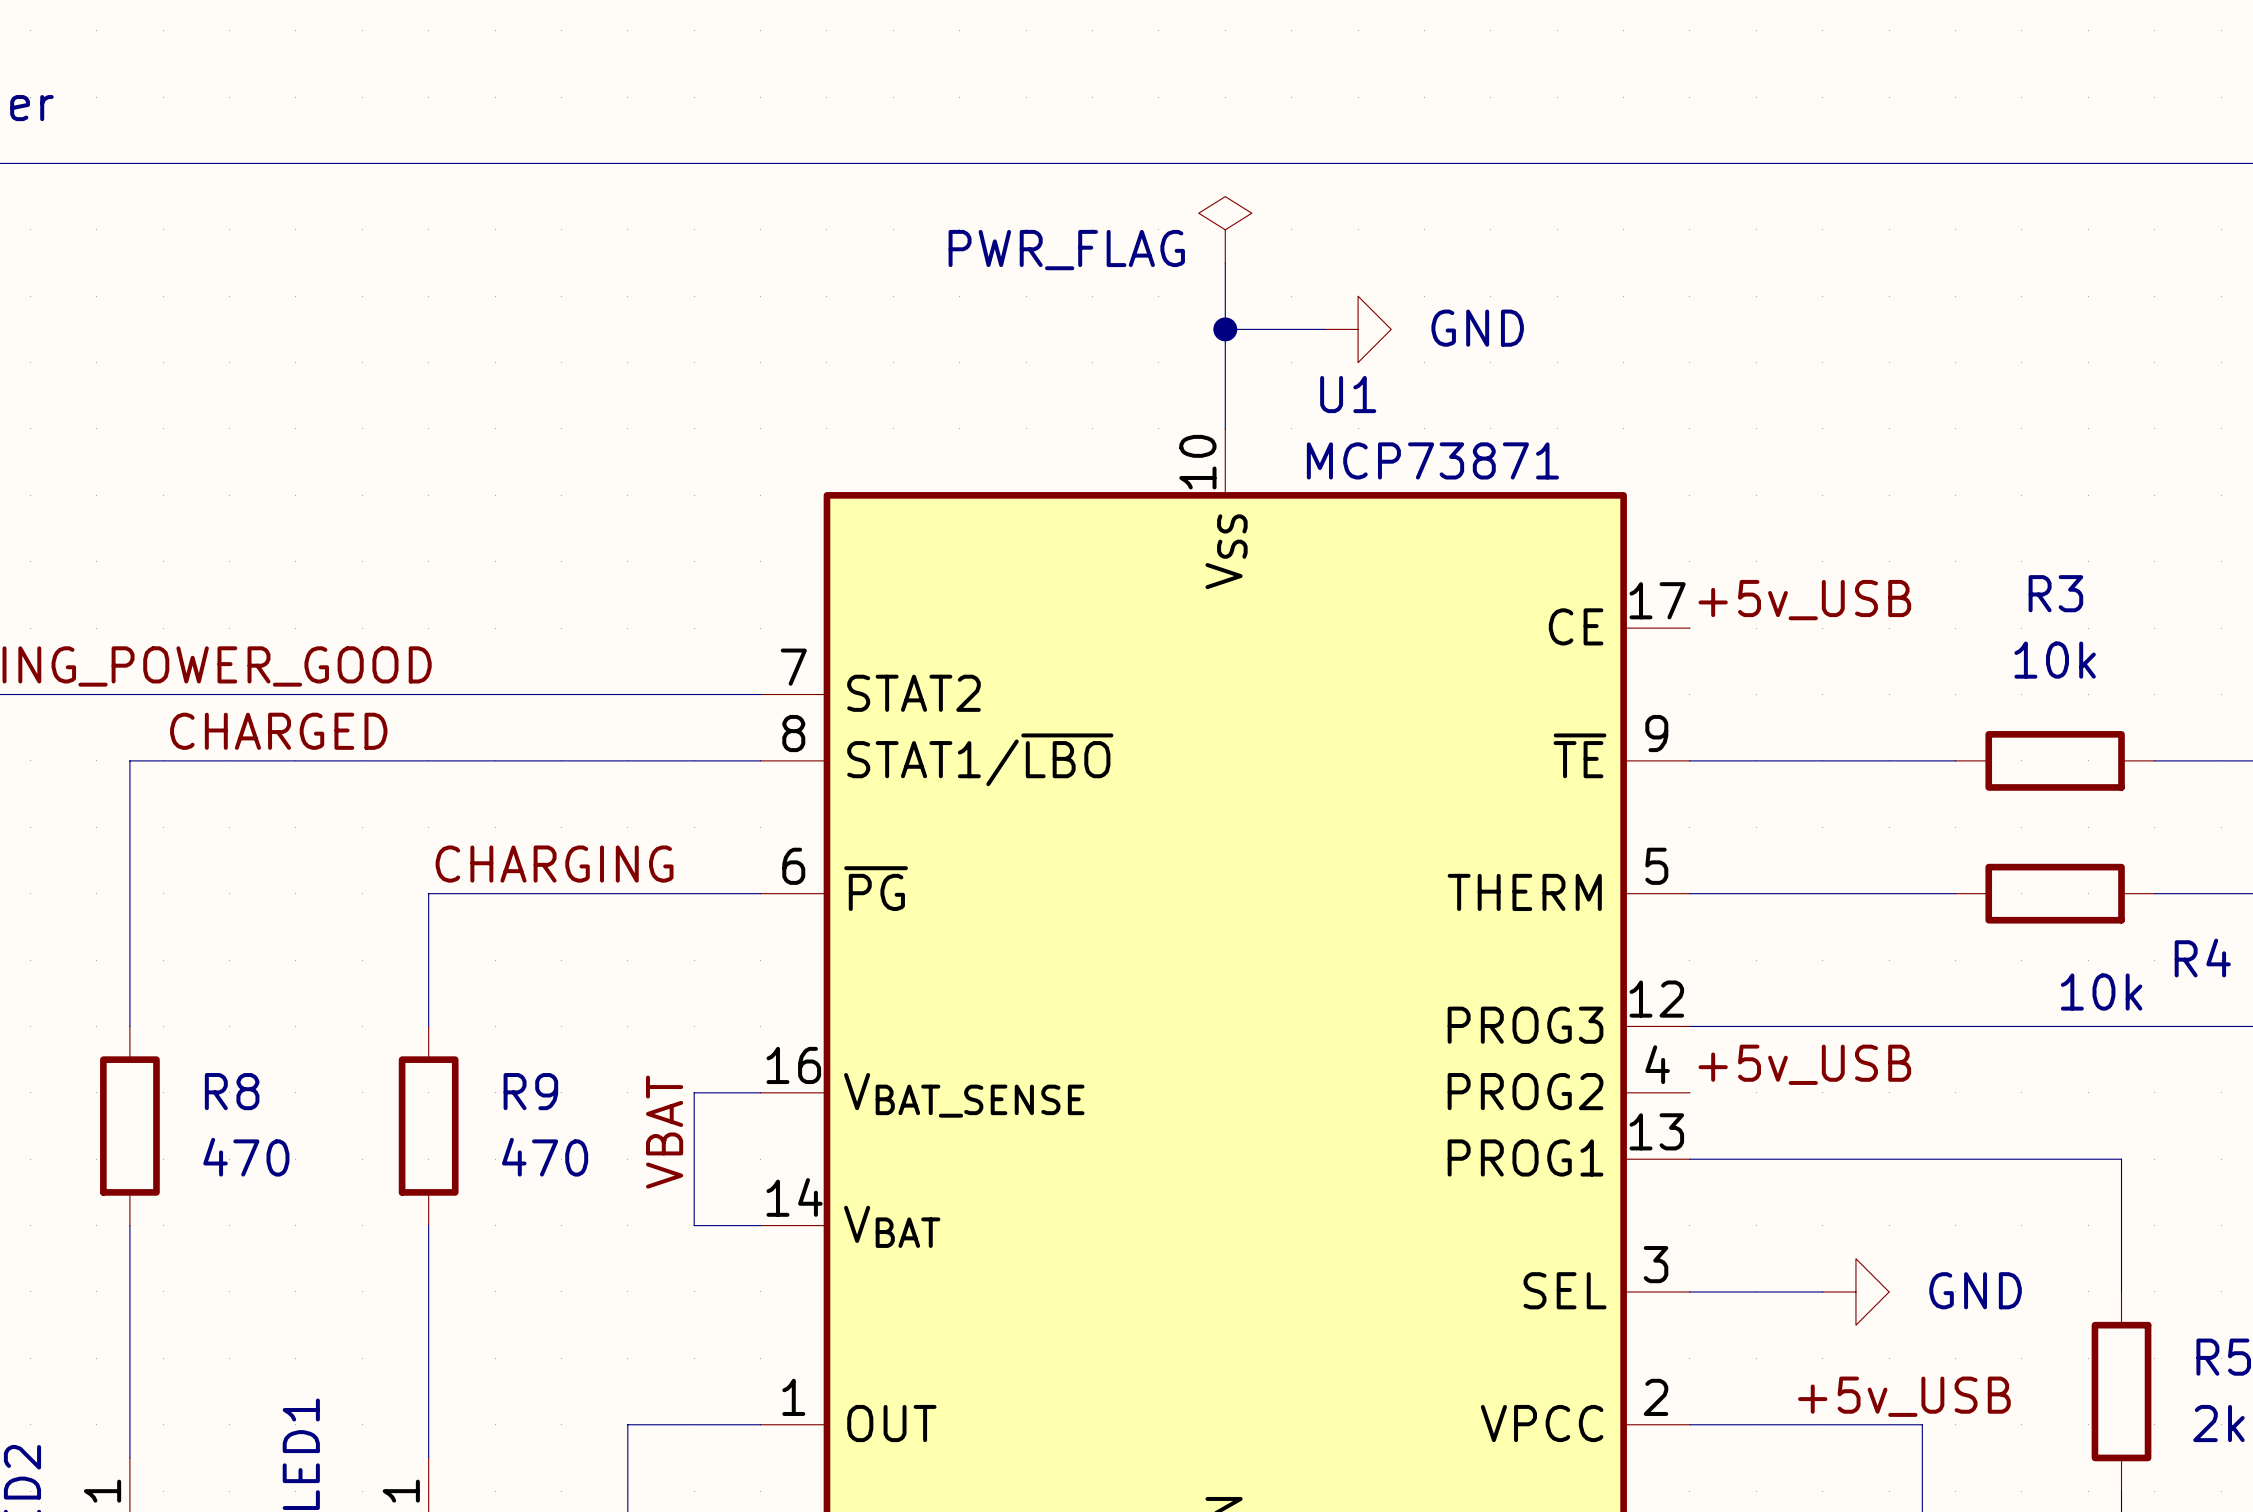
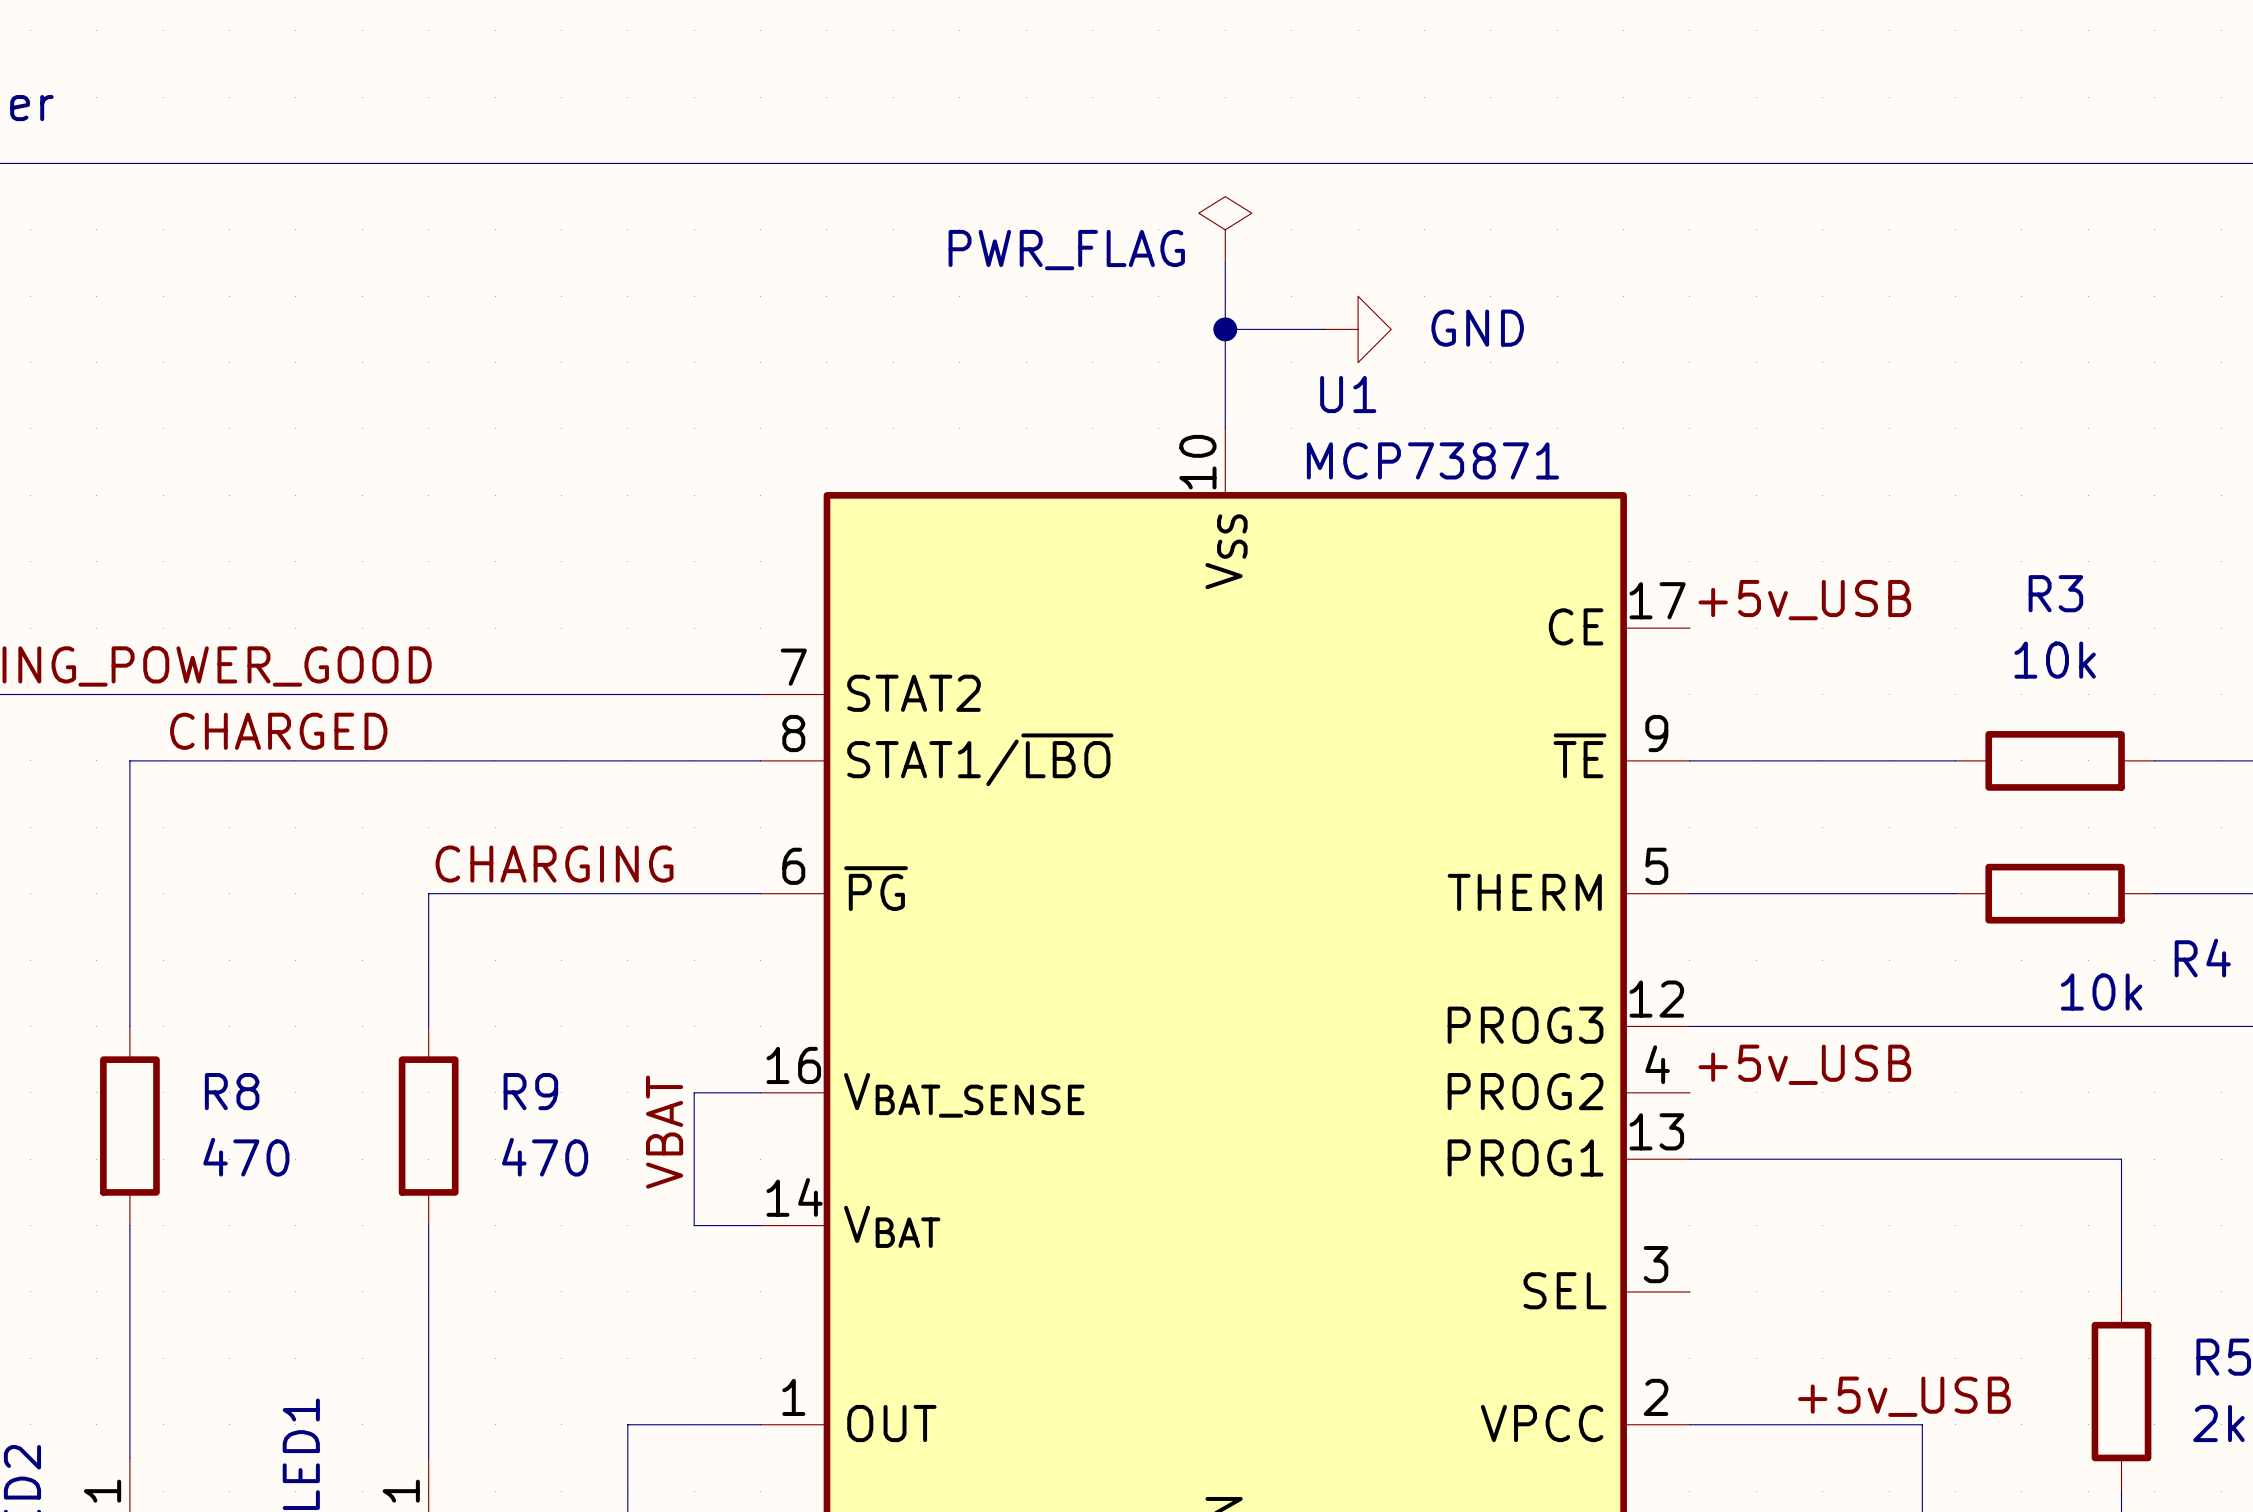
wire: (1689, 1291) (1822, 1291) -> none
power symbol: GND (1855, 1291) -> none

